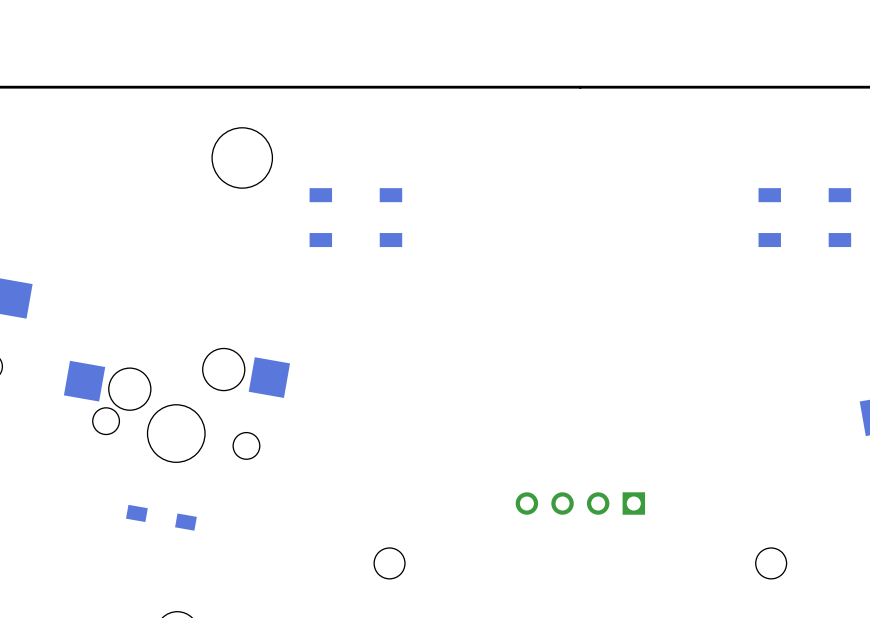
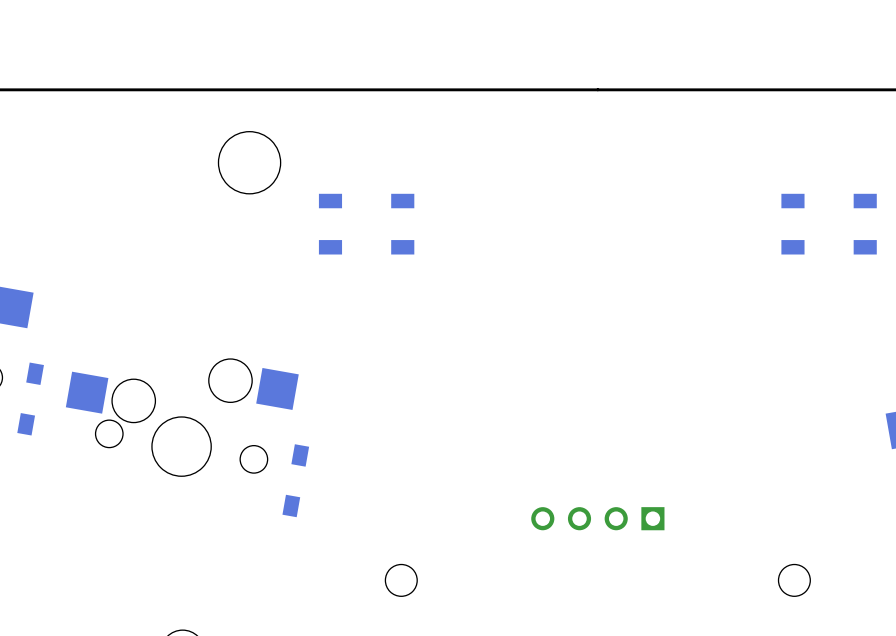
part: none -> (30, 399)
part: none -> (295, 480)
part: (161, 517) -> none

